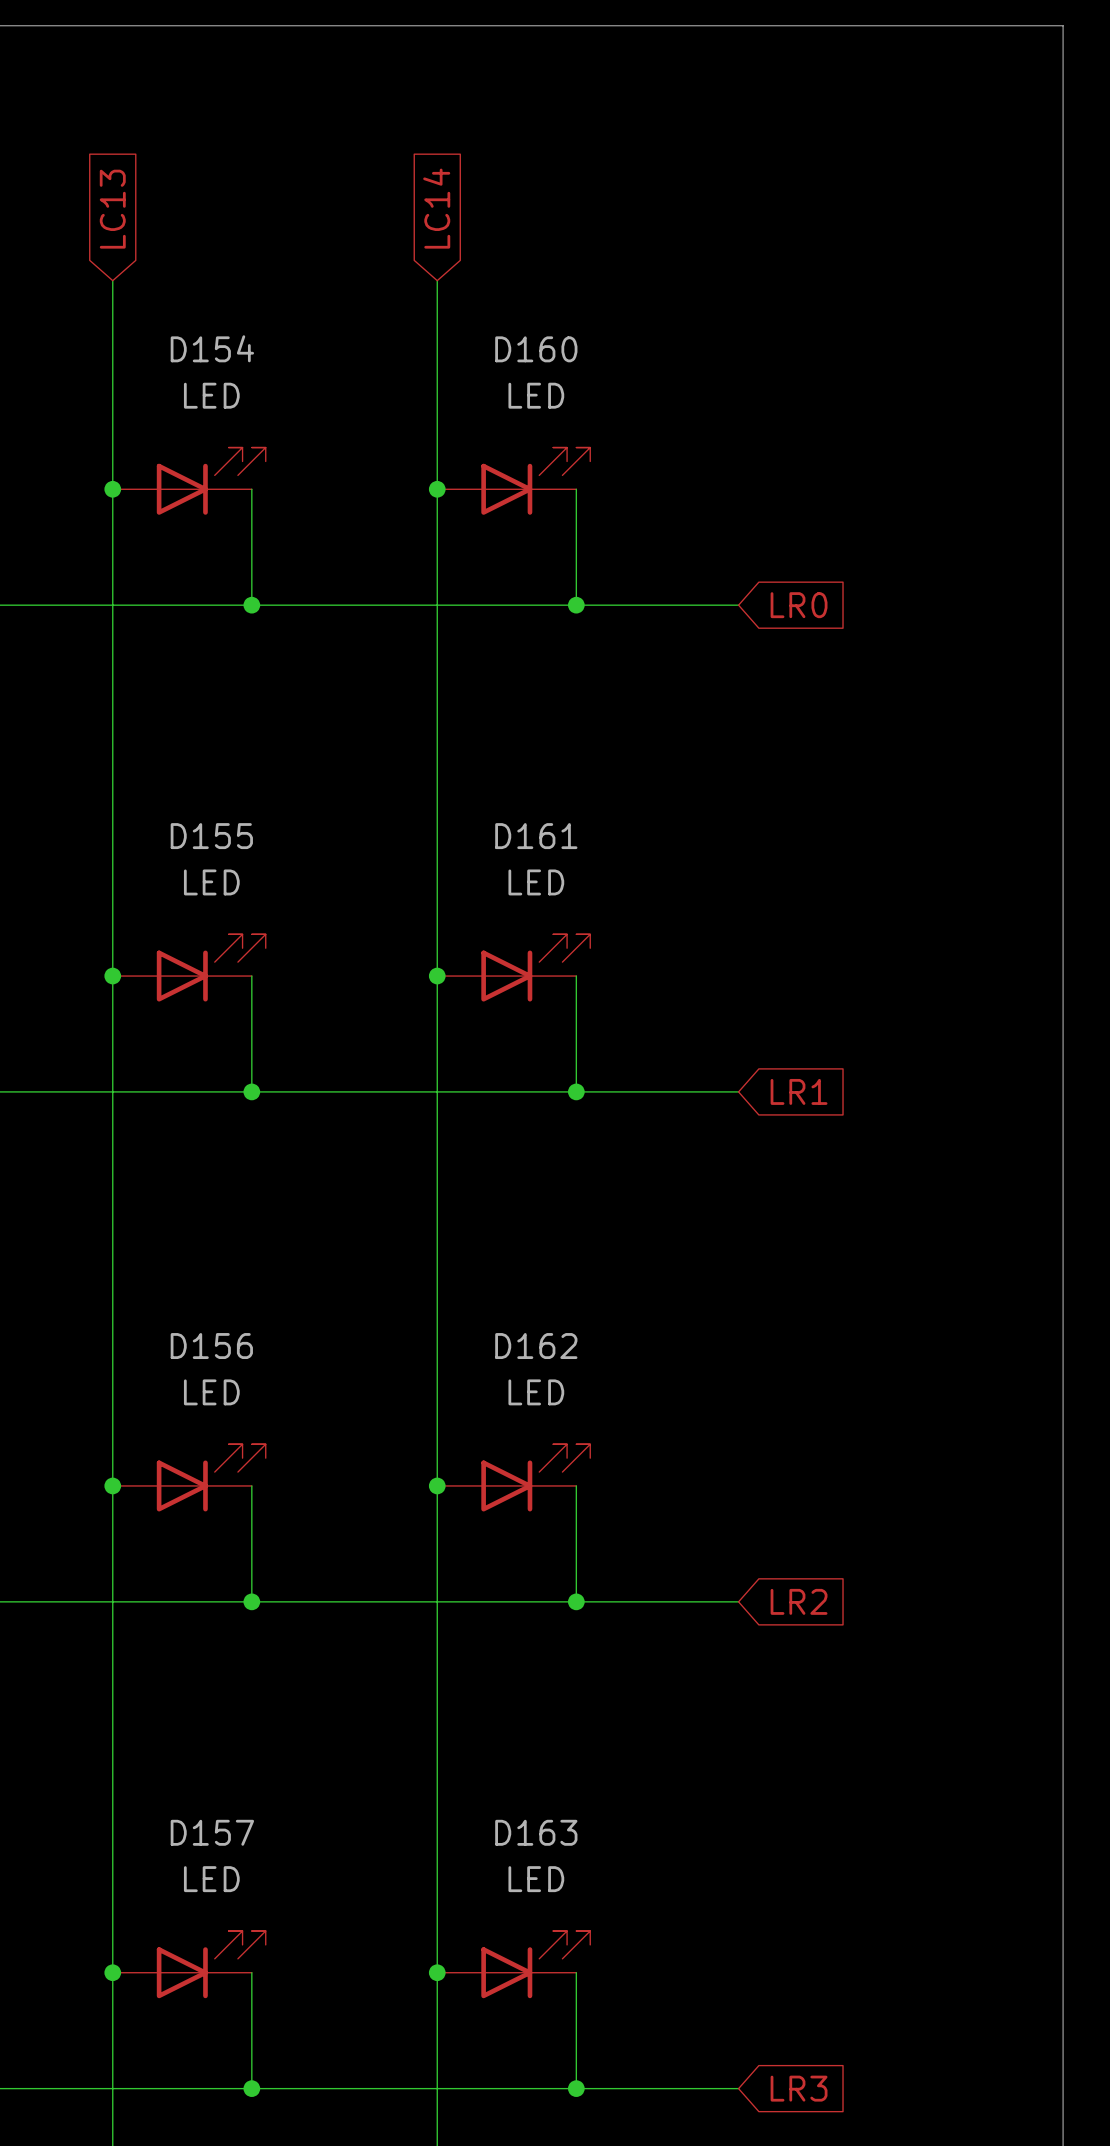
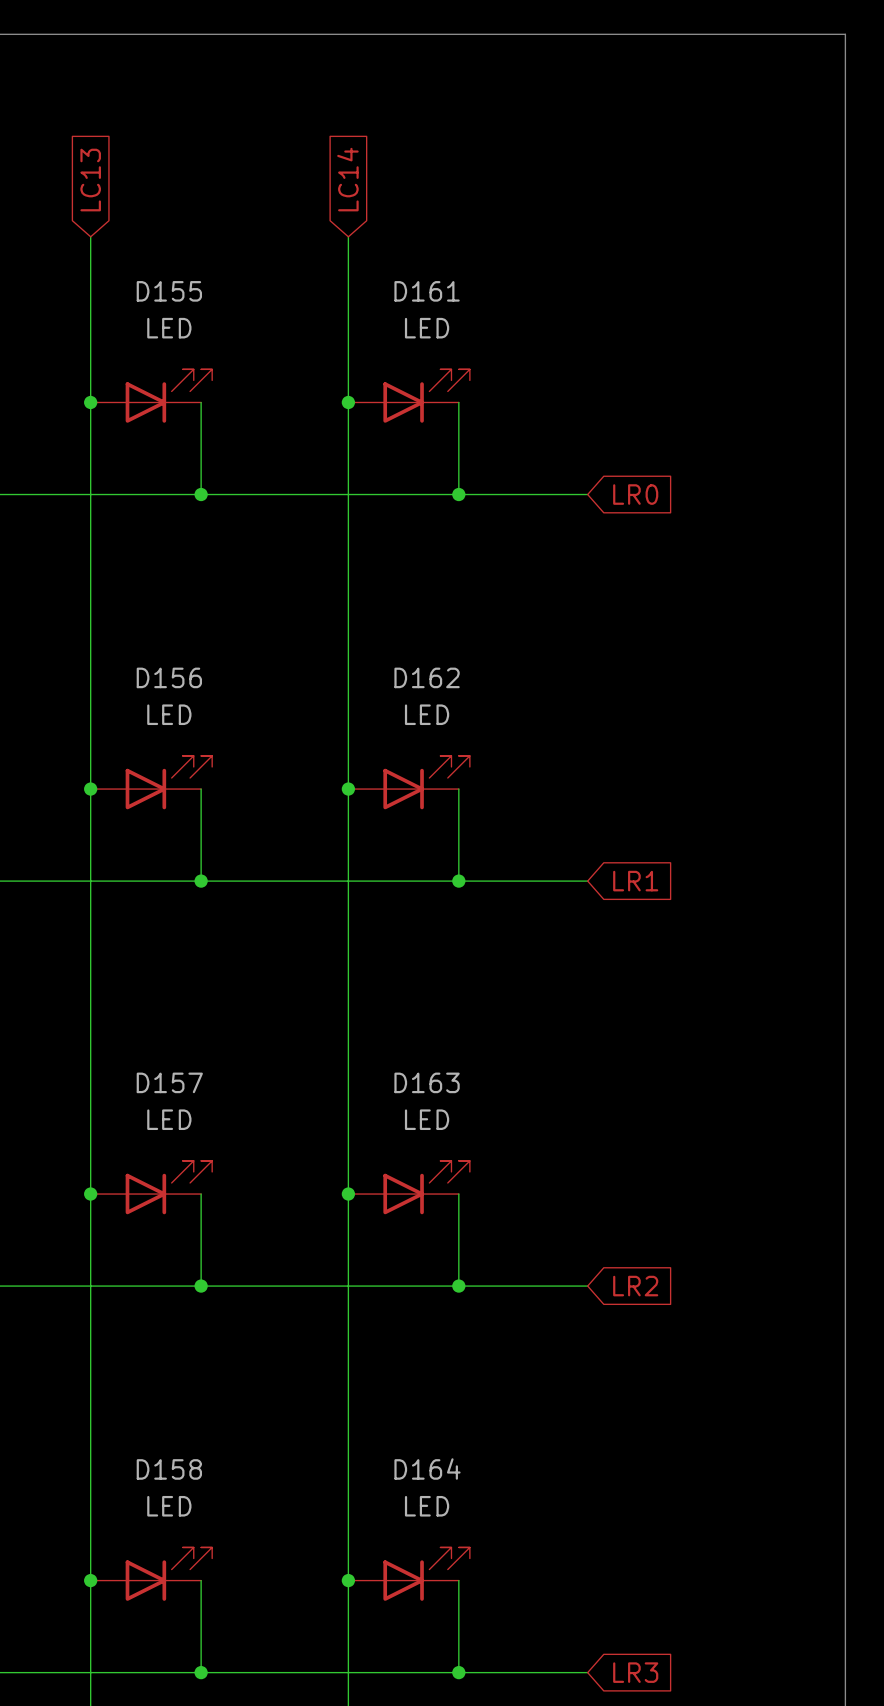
D154 name: D154 (212, 348) -> D155 (169, 291)
D160 name: D160 (536, 349) -> D161 (427, 291)
D155 name: D155 (211, 836) -> D156 (169, 677)
D161 name: D161 (536, 836) -> D162 (427, 677)
D156 name: D156 (211, 1346) -> D157 (169, 1082)
D162 name: D162 (536, 1346) -> D163 (427, 1082)
D157 name: D157 (212, 1832) -> D158 (169, 1469)
D163 name: D163 (536, 1832) -> D164 (427, 1469)

